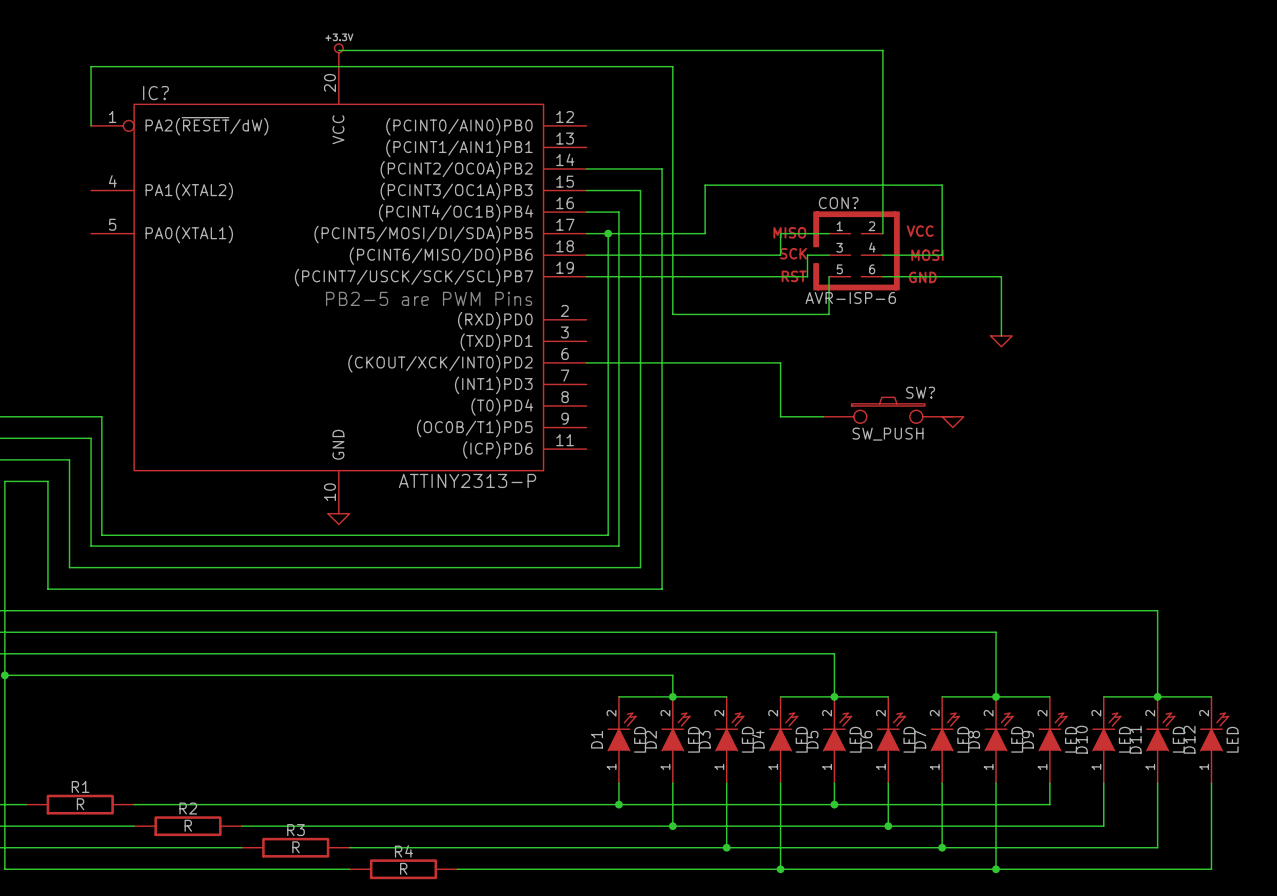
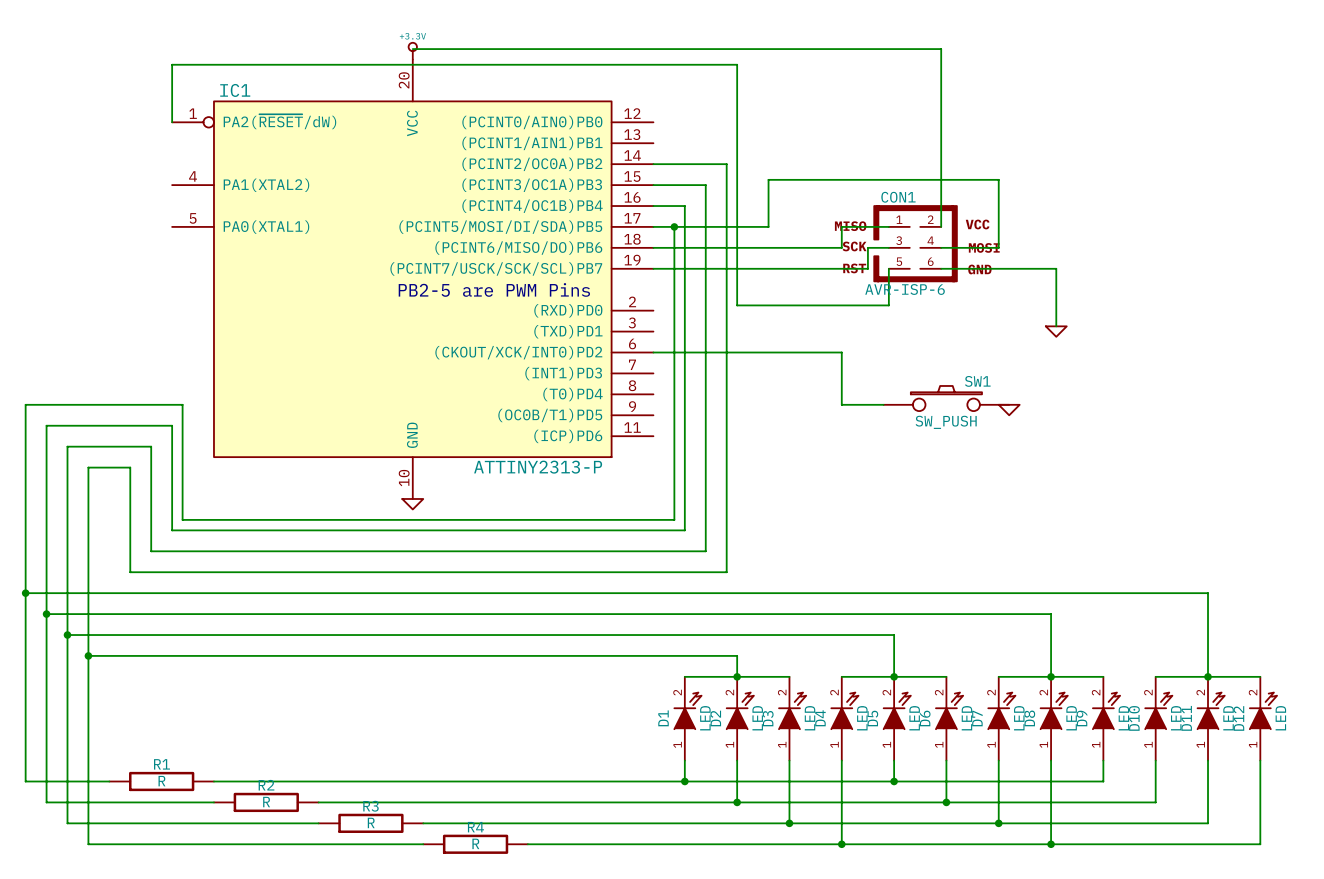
IC? name: IC? (155, 93) -> IC1 (235, 90)
CON? name: CON? (838, 203) -> CON1 (898, 197)
SW? name: SW? (920, 392) -> SW1 (977, 381)

